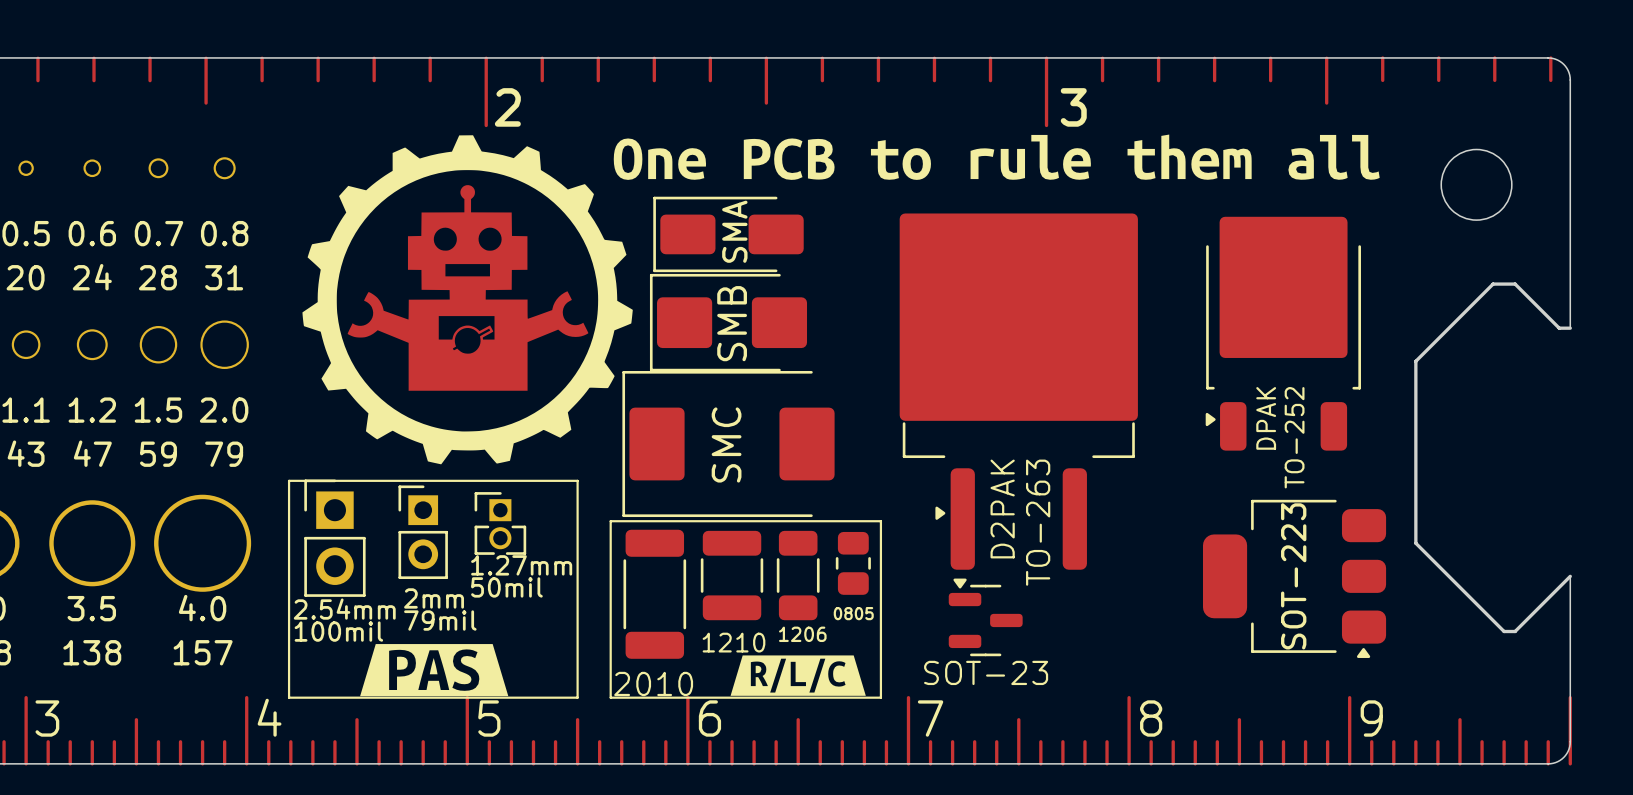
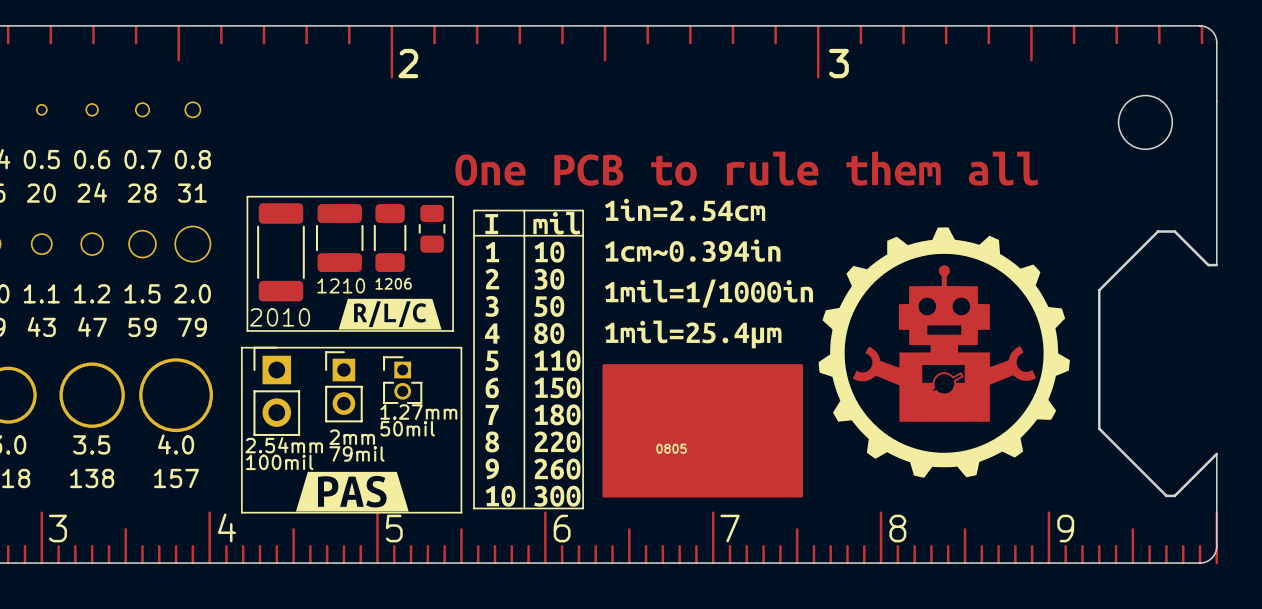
drawing: [302, 134, 1380, 465] -> none
drawing: none -> [455, 151, 1070, 498]
text: SMA (734, 231) -> none
part: (728, 234) -> none
line: none -> (474, 210) (583, 210) (583, 508) (474, 508) (474, 210)
line: none -> (524, 210) (524, 508)
drawing: none -> [484, 211, 581, 507]
part: (728, 322) -> none
text: SMB (732, 323) -> none
board edge: (1570, 328) (1559, 328) (1515, 284) (1493, 284) (1415, 361) (1415, 405) -> (1216, 231) (1216, 265) (1208, 265) (1174, 231) (1158, 231) (1099, 290)
line: none -> (474, 235) (583, 235)
part: (1283, 333) -> none
part: (1018, 391) -> none
text: DPAK (1266, 418) -> none
text: TO-252 (1294, 437) -> none
text: SMC (726, 444) -> none
part: (728, 444) -> none
text: D2PAK (1002, 509) -> none
line: (610, 521) (880, 521) (880, 697) (610, 697) (610, 521) -> (247, 196) (453, 196) (453, 330) (247, 330) (247, 196)
text: TO-263 (1038, 522) -> none
board edge: (1415, 543) (1504, 631) (1515, 631) (1570, 576) (1570, 620) -> (1099, 395) (1099, 428) (1166, 495) (1174, 495) (1216, 453)
part position: (853, 563) -> (432, 228)
part position: (732, 575) -> (339, 238)
part position: (798, 575) -> (390, 238)
part: SOT-223 (1294, 578) -> none
part position: (654, 594) -> (280, 252)
part: (985, 617) -> none
text position: 1206 (802, 634) -> 1206 (393, 283)
text position: 1210 (733, 642) -> 1210 (341, 285)
text: SOT-23 (986, 672) -> none
drawing position: (798, 675) -> (390, 314)
text position: 2010 (653, 683) -> 2010 (280, 317)

